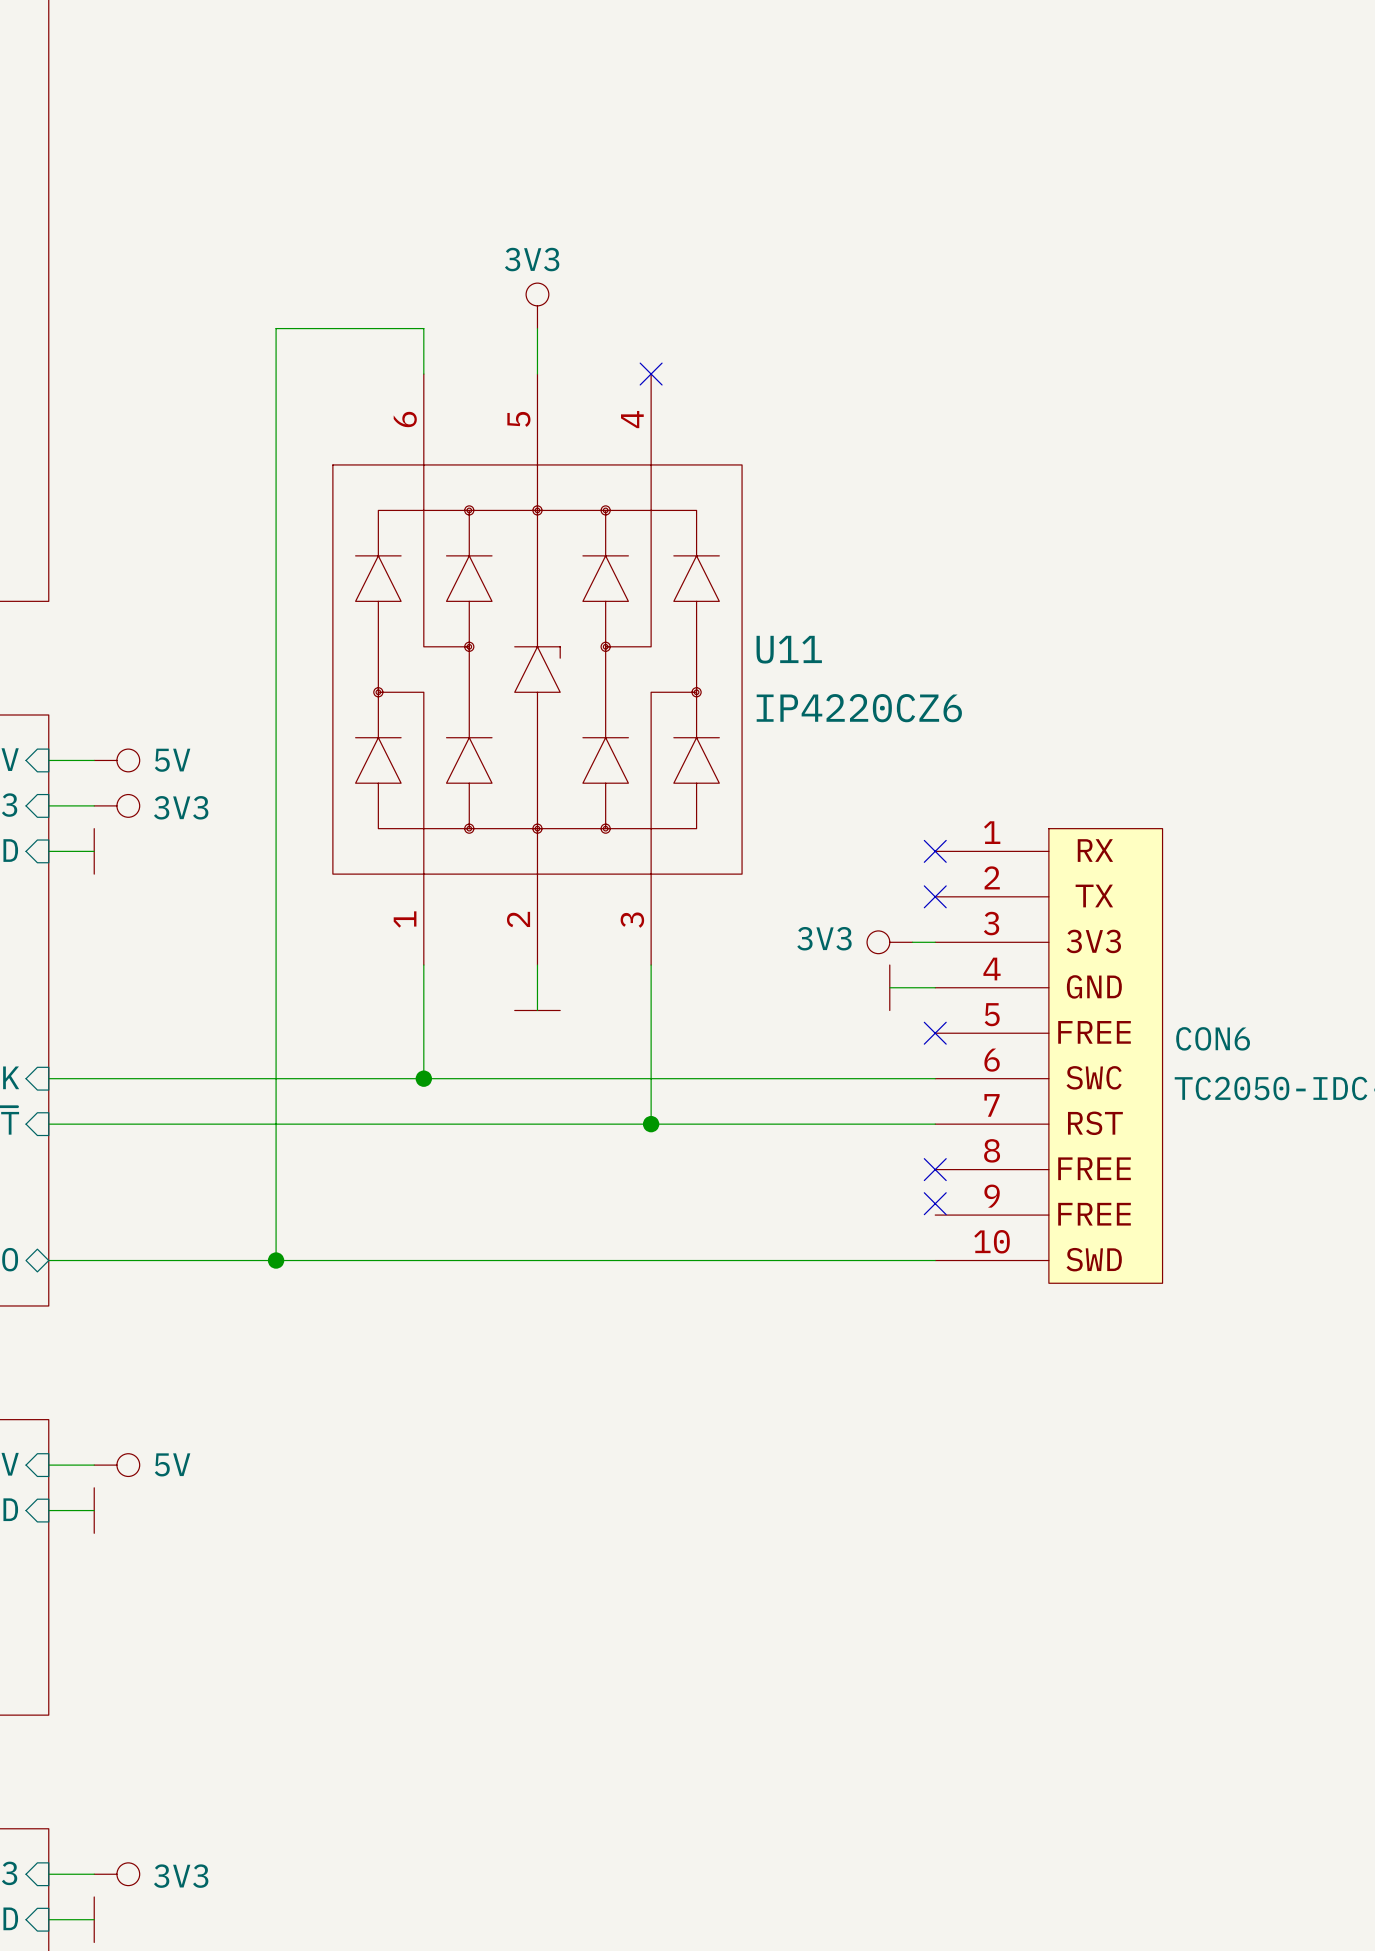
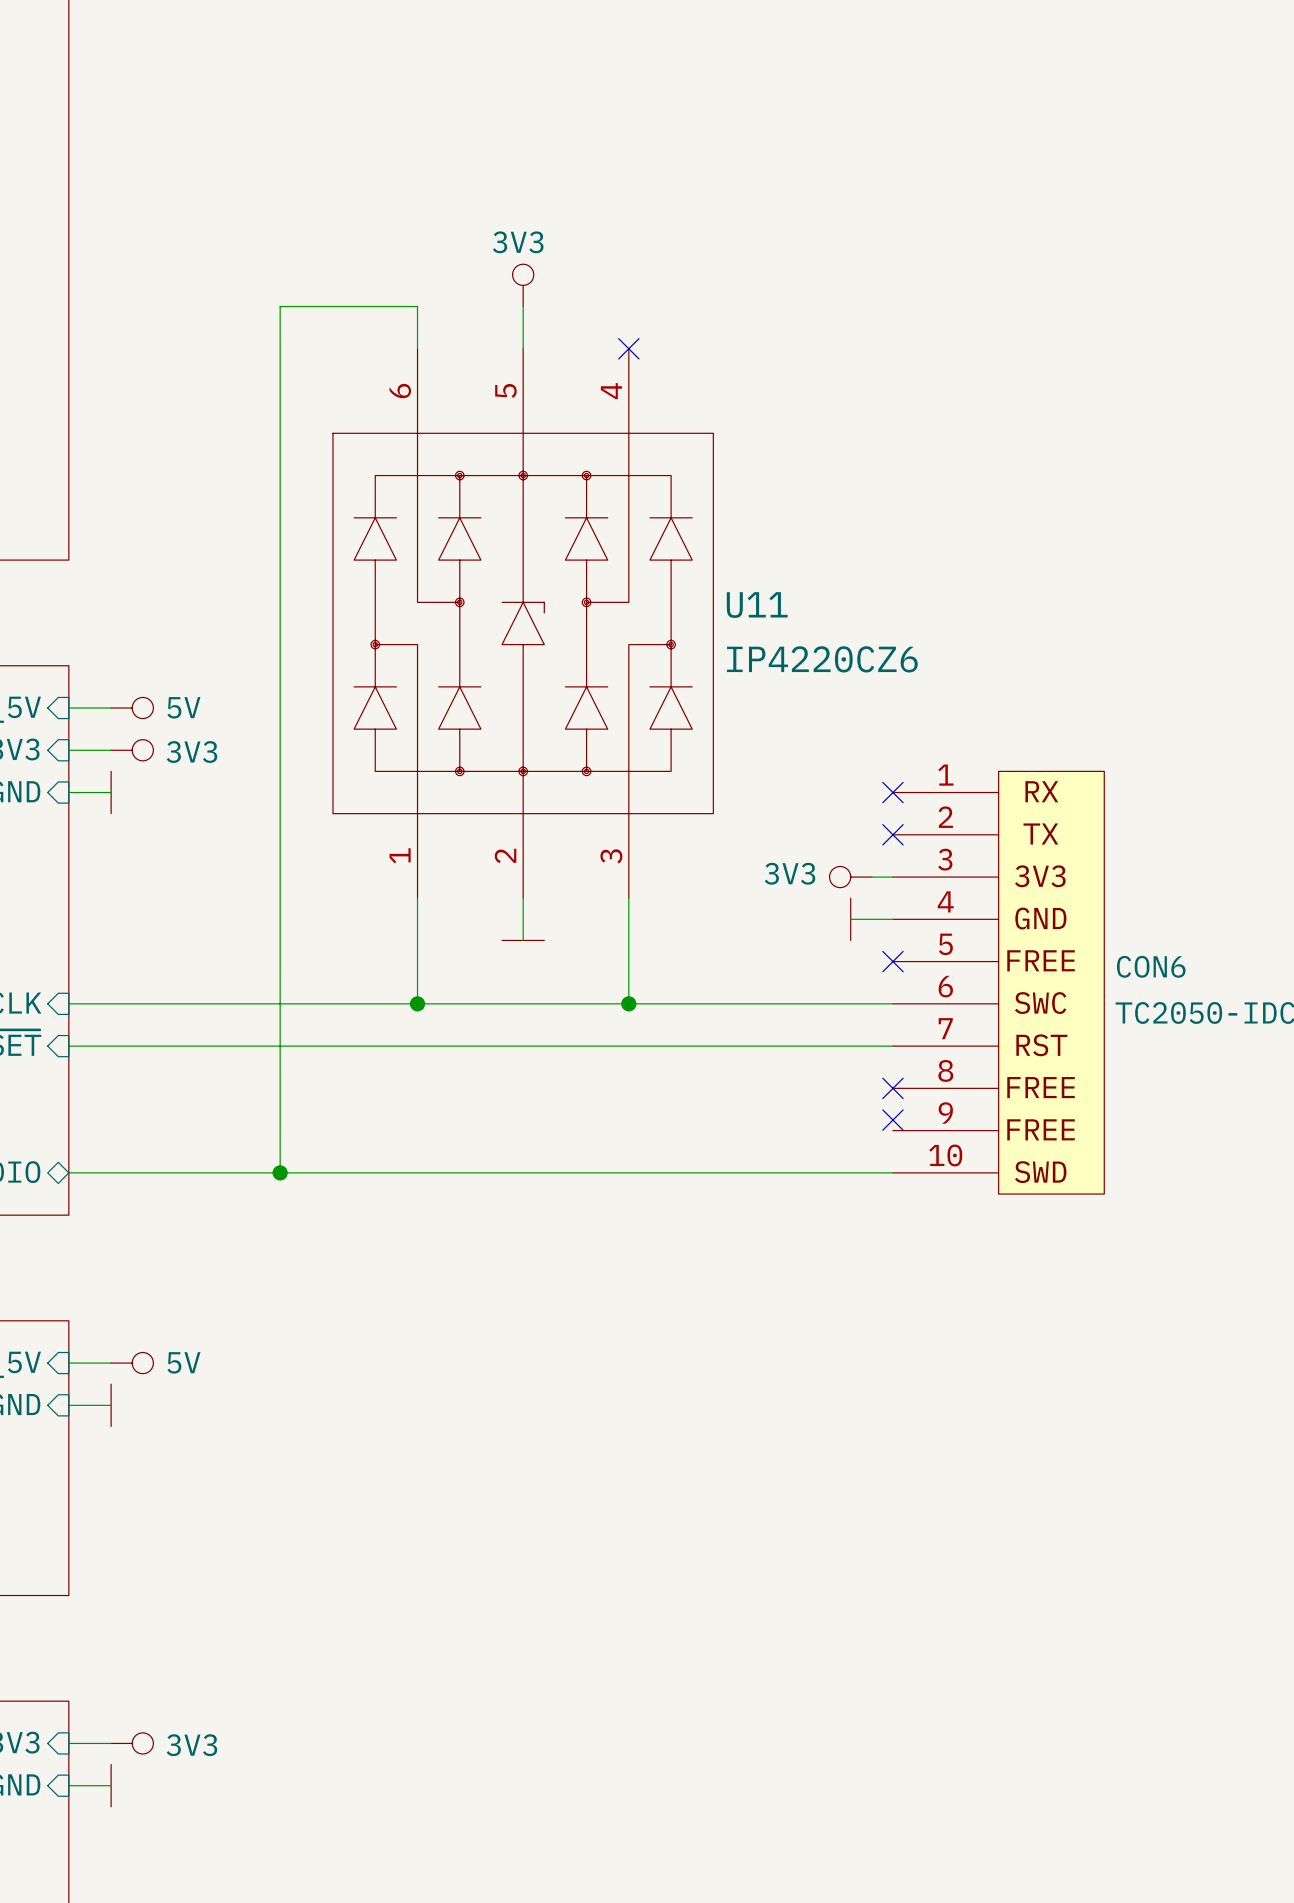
wire: (651, 1078) (651, 1124) -> none
junction position: (651, 1124) -> (628, 1003)

